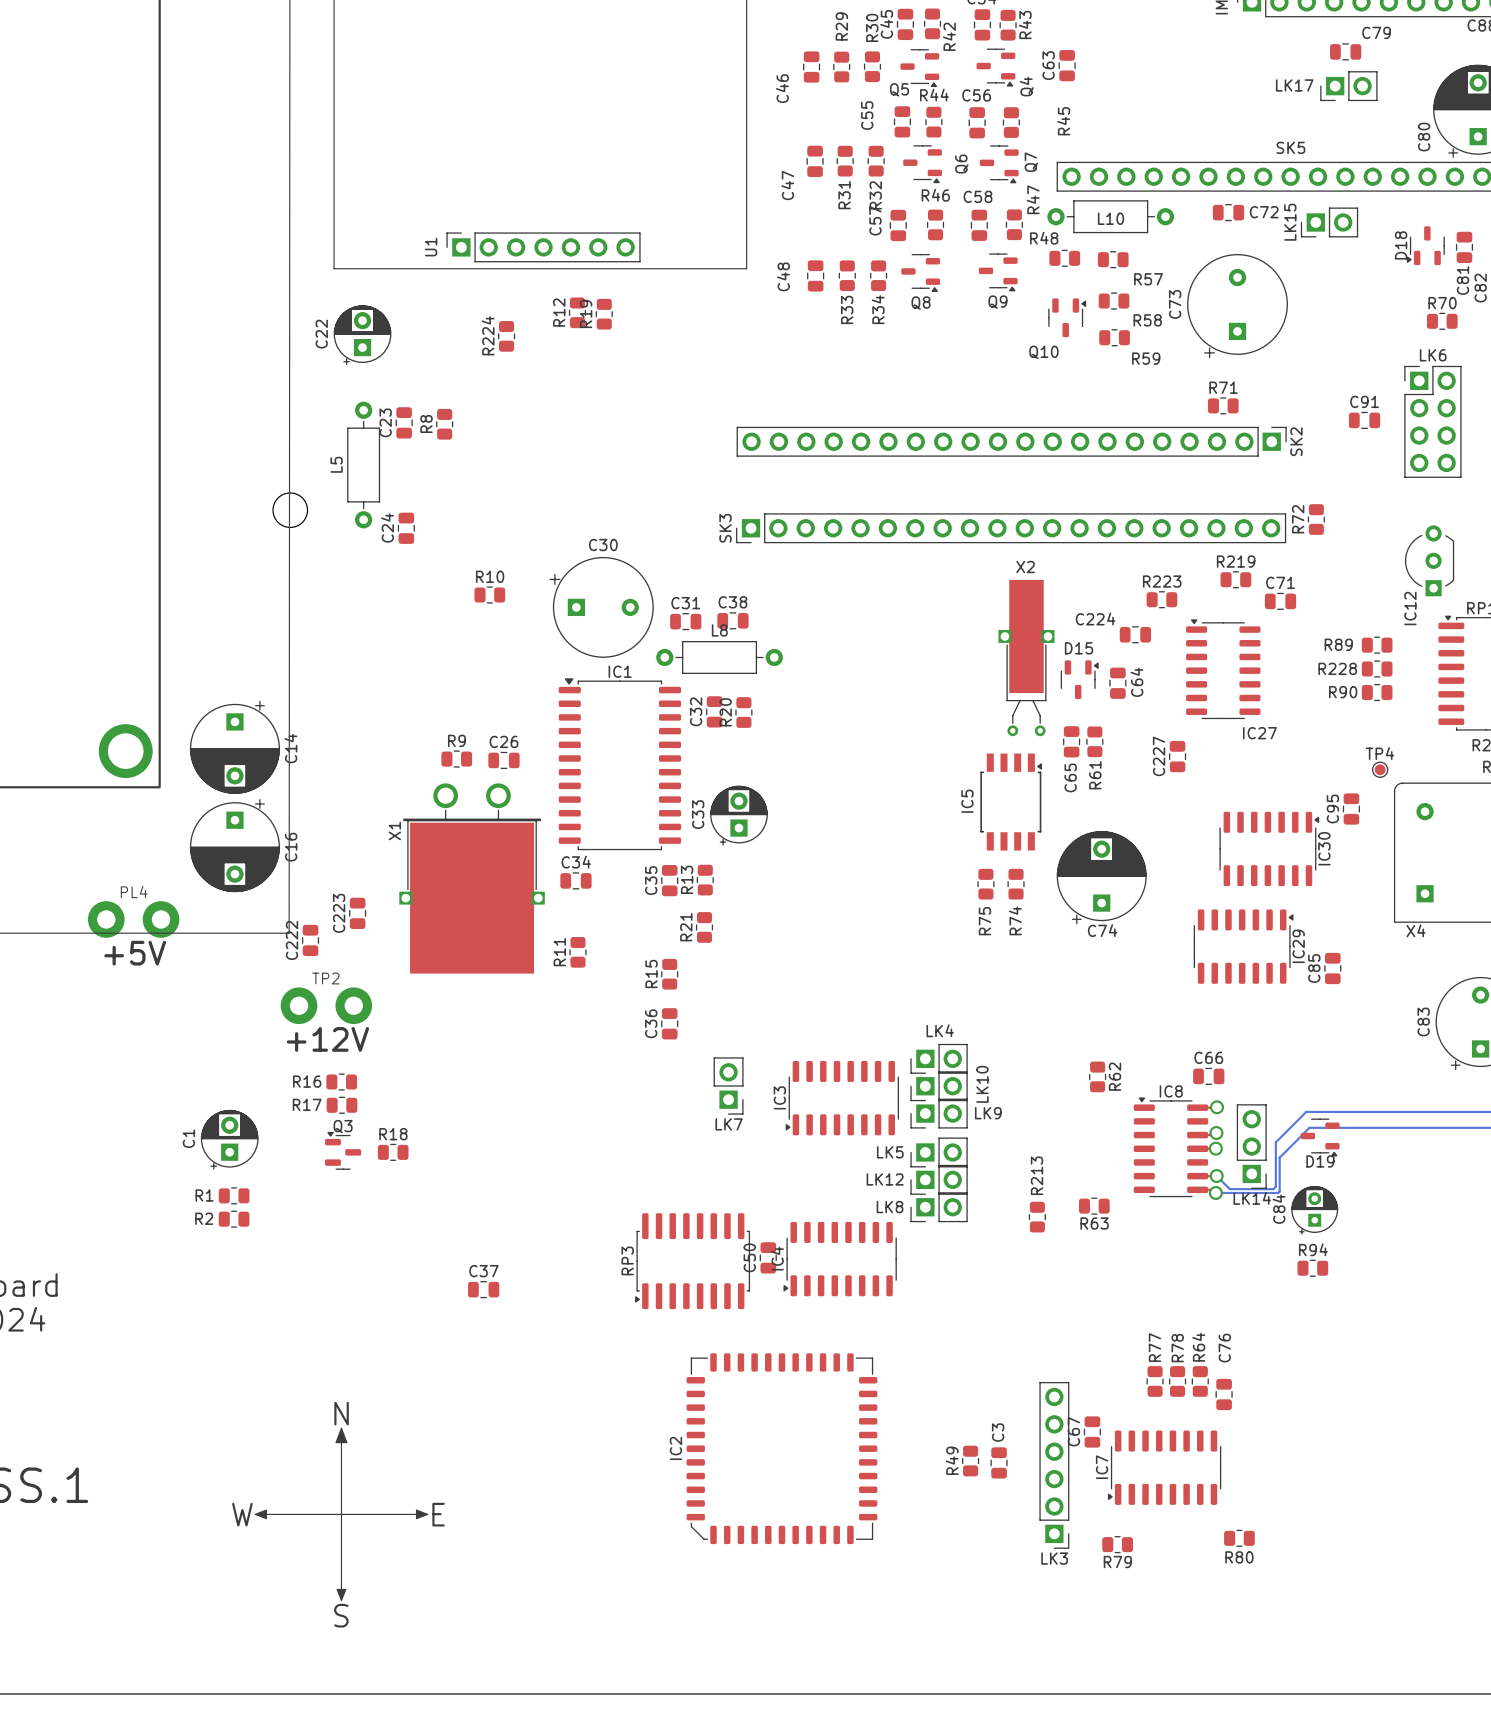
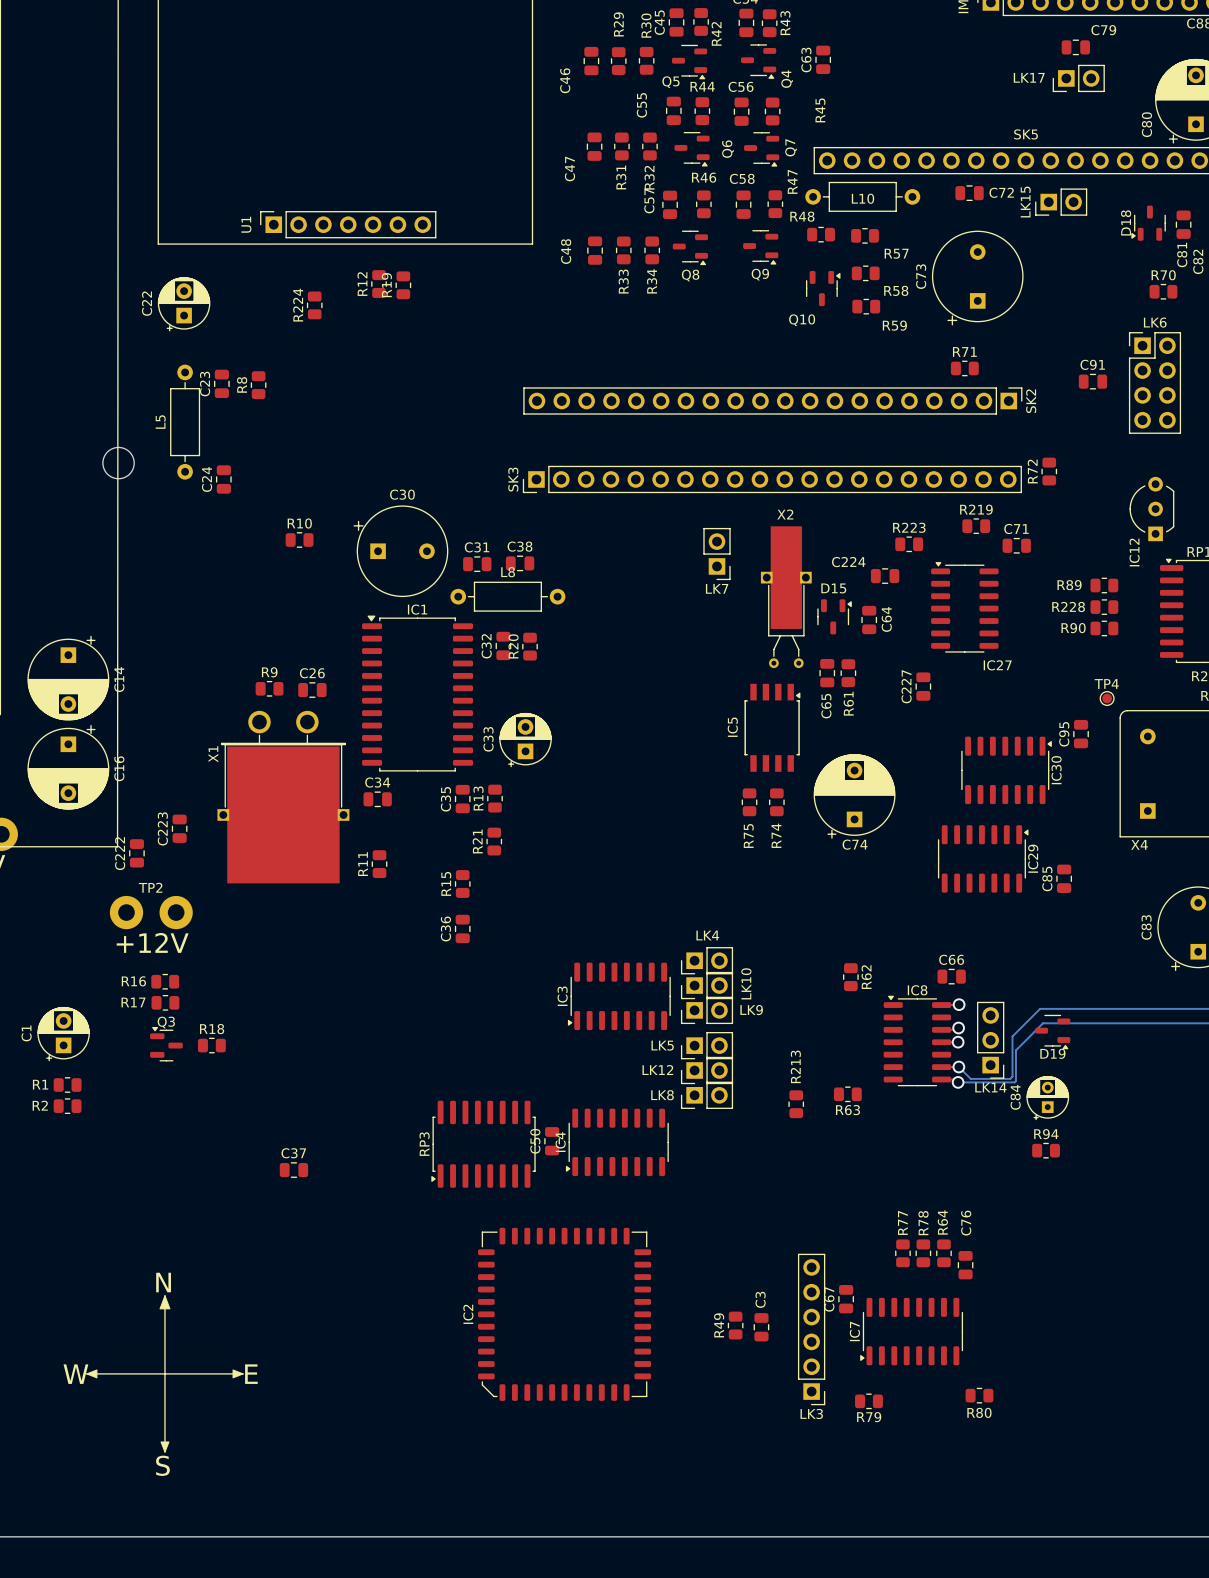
LK7 position: (728, 1086) -> (717, 554)

